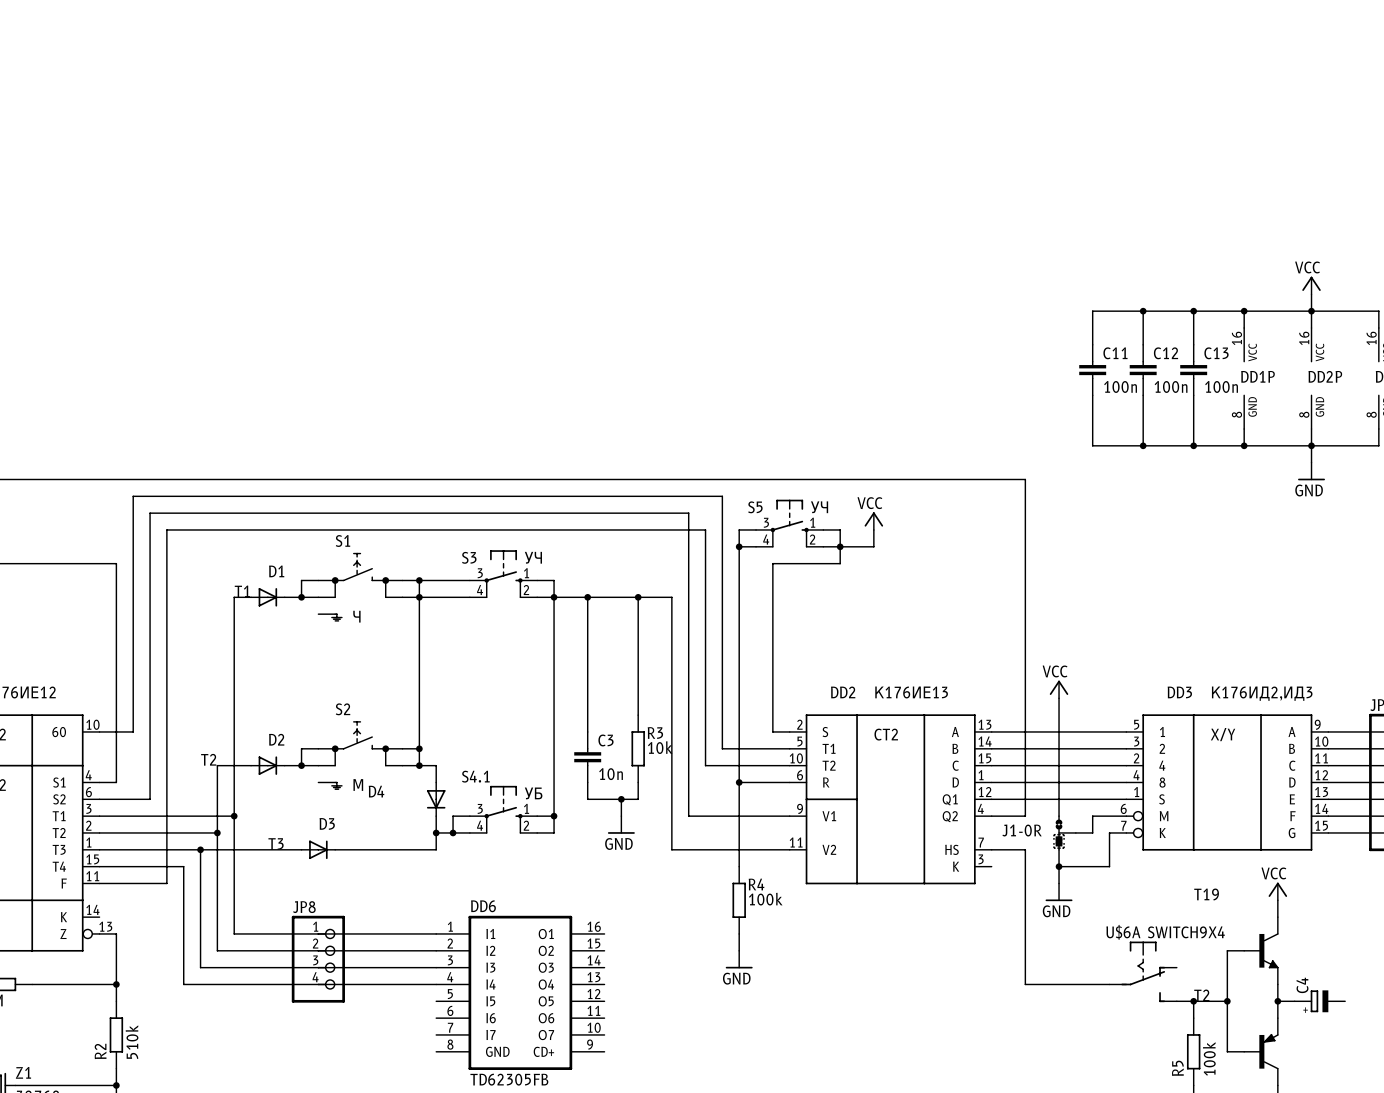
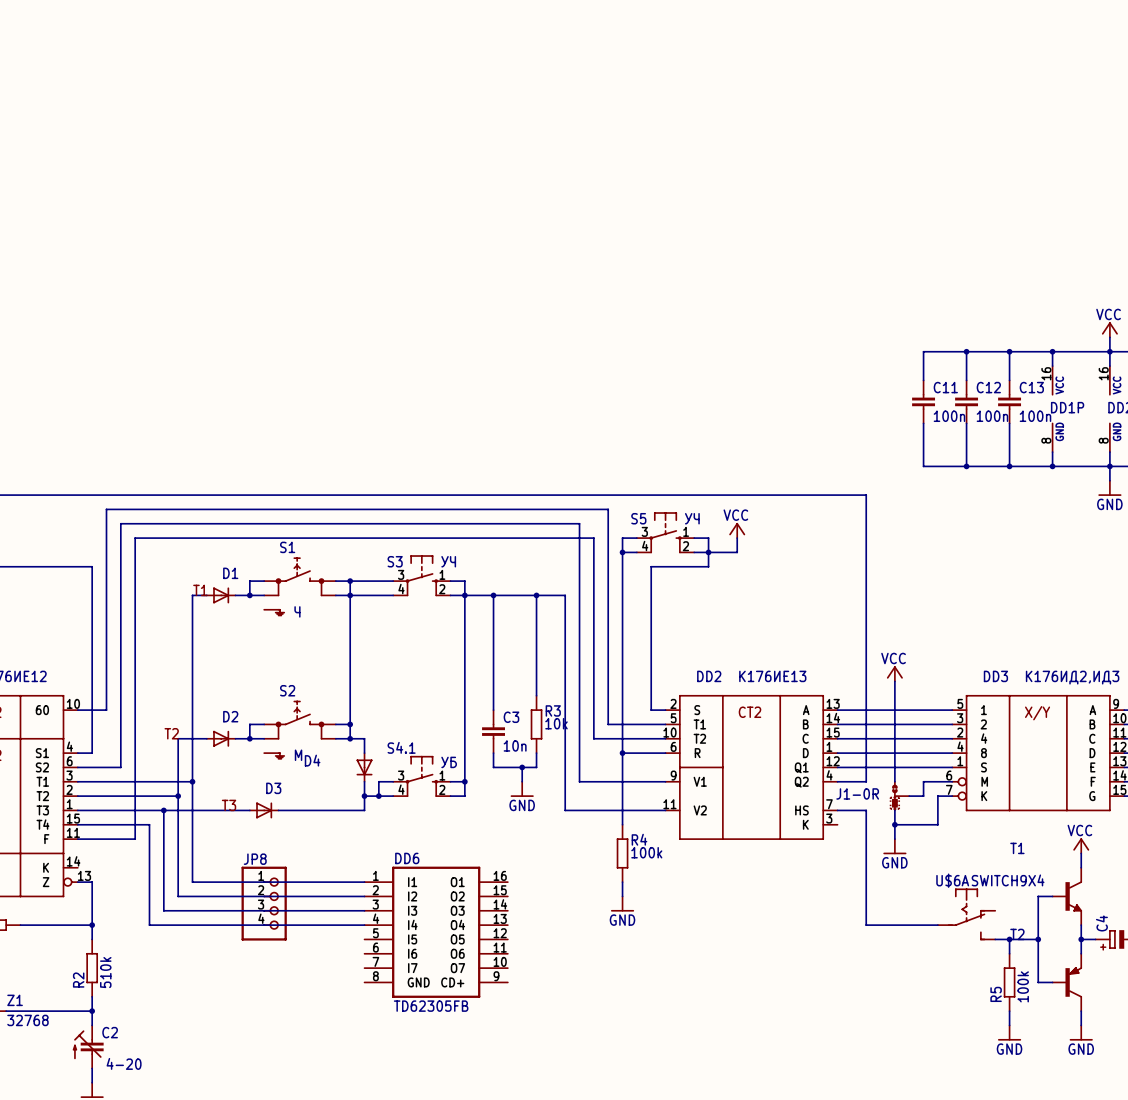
T19 name: T19 (1206, 894) -> T1 (1017, 848)

